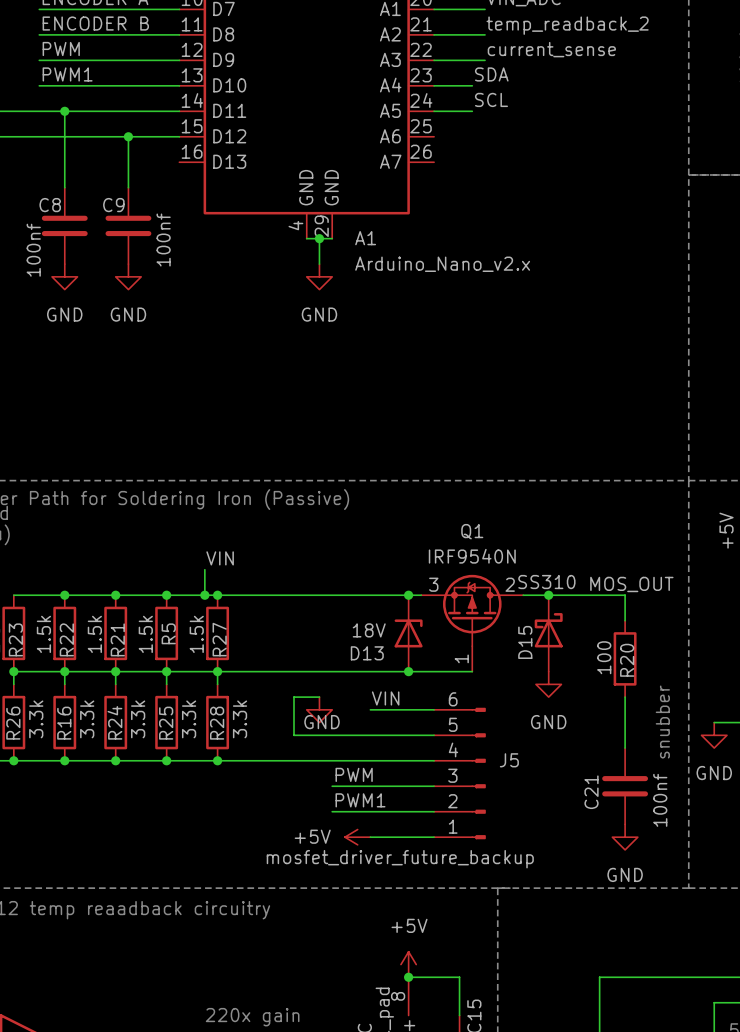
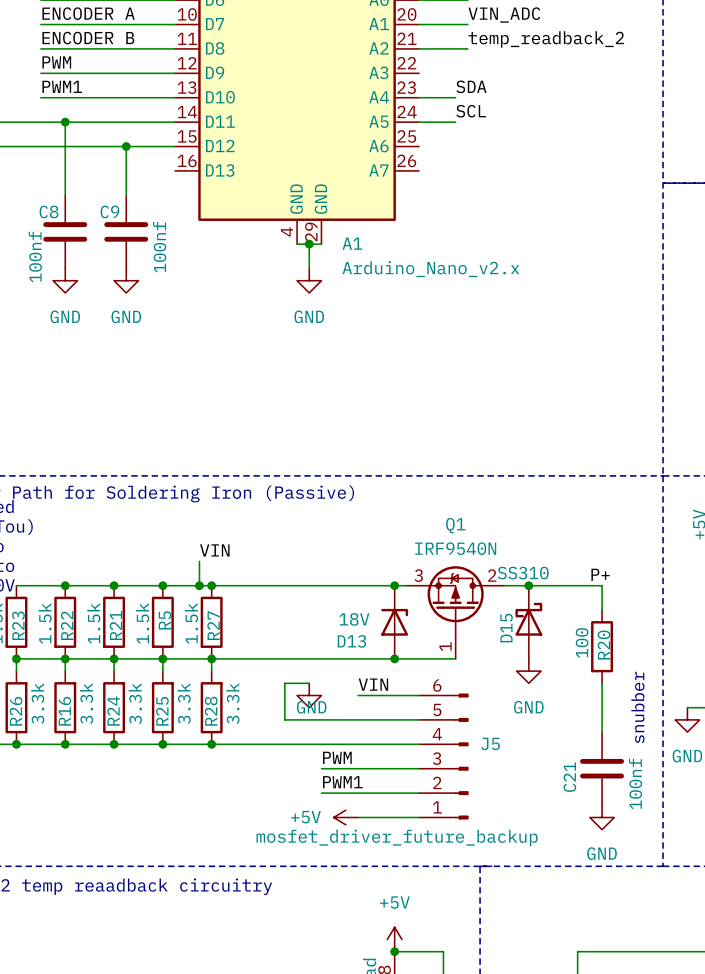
label: current_sense (551, 49) -> none
wire: (434, 60) (485, 60) -> none
label: none -> P+ (600, 574)
label: MOS_OUT (631, 584) -> none

